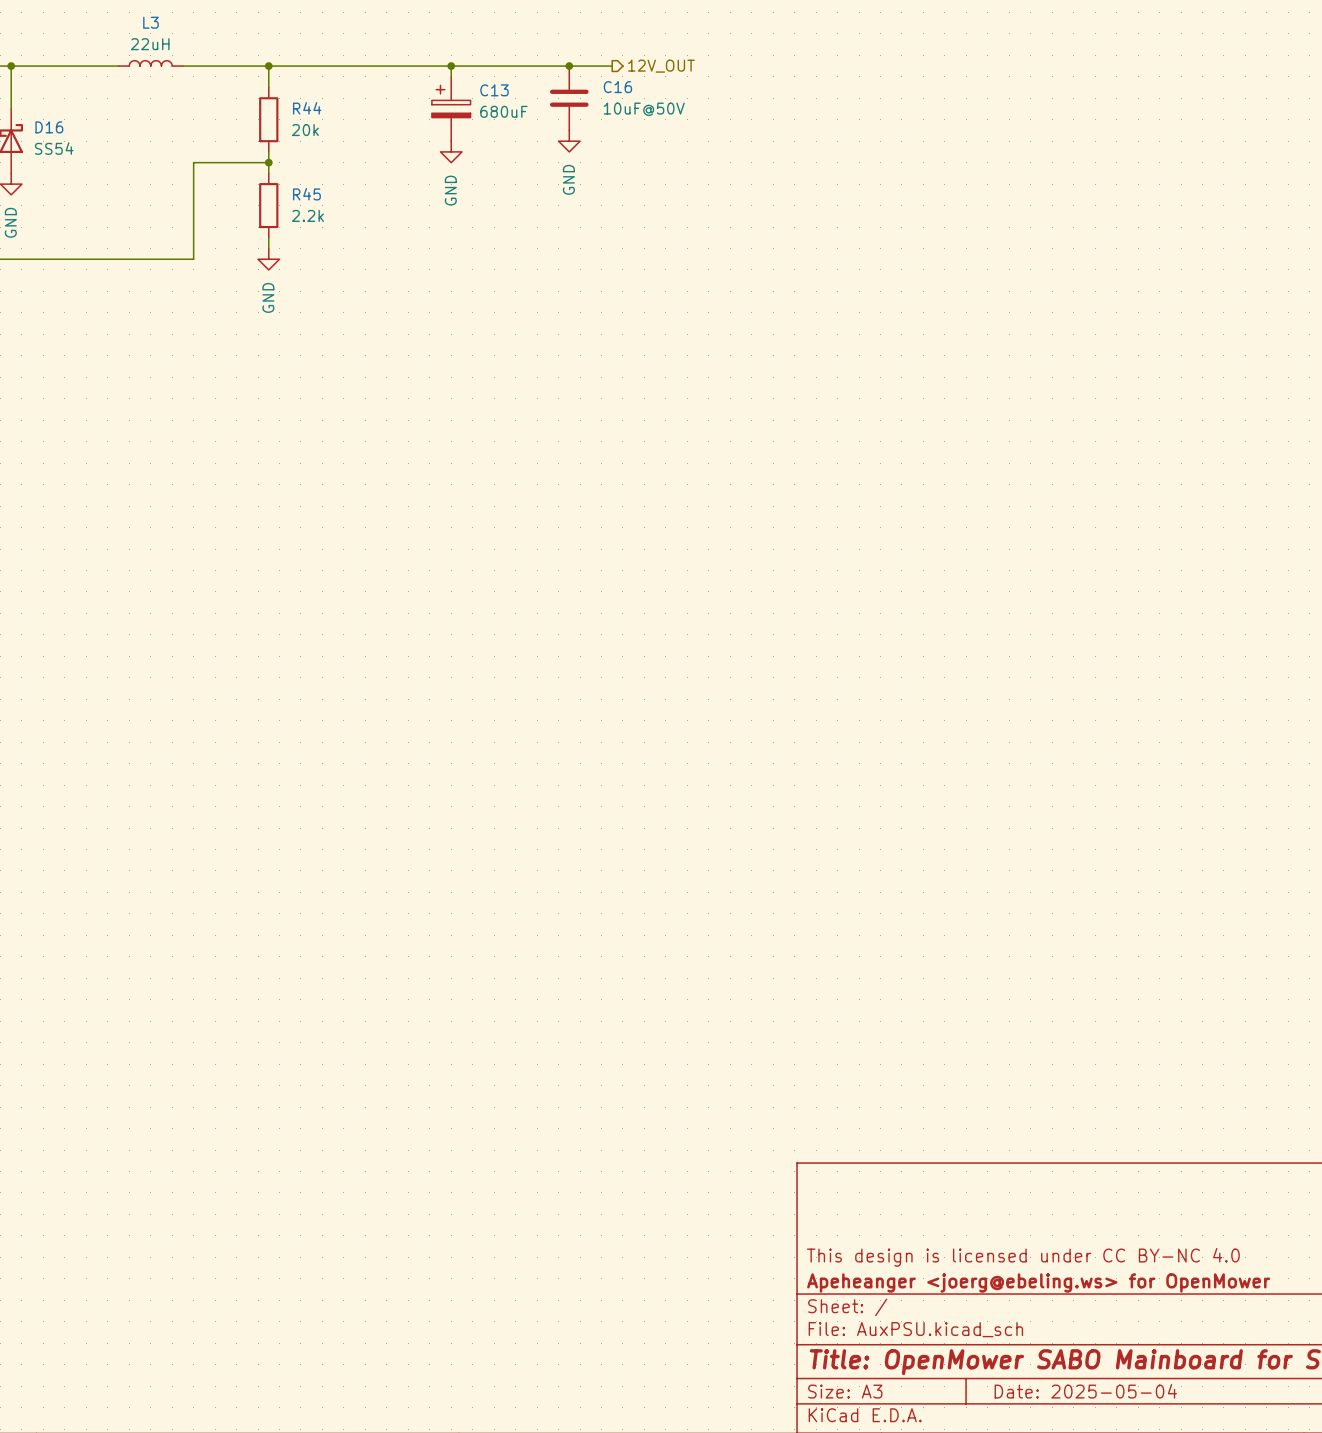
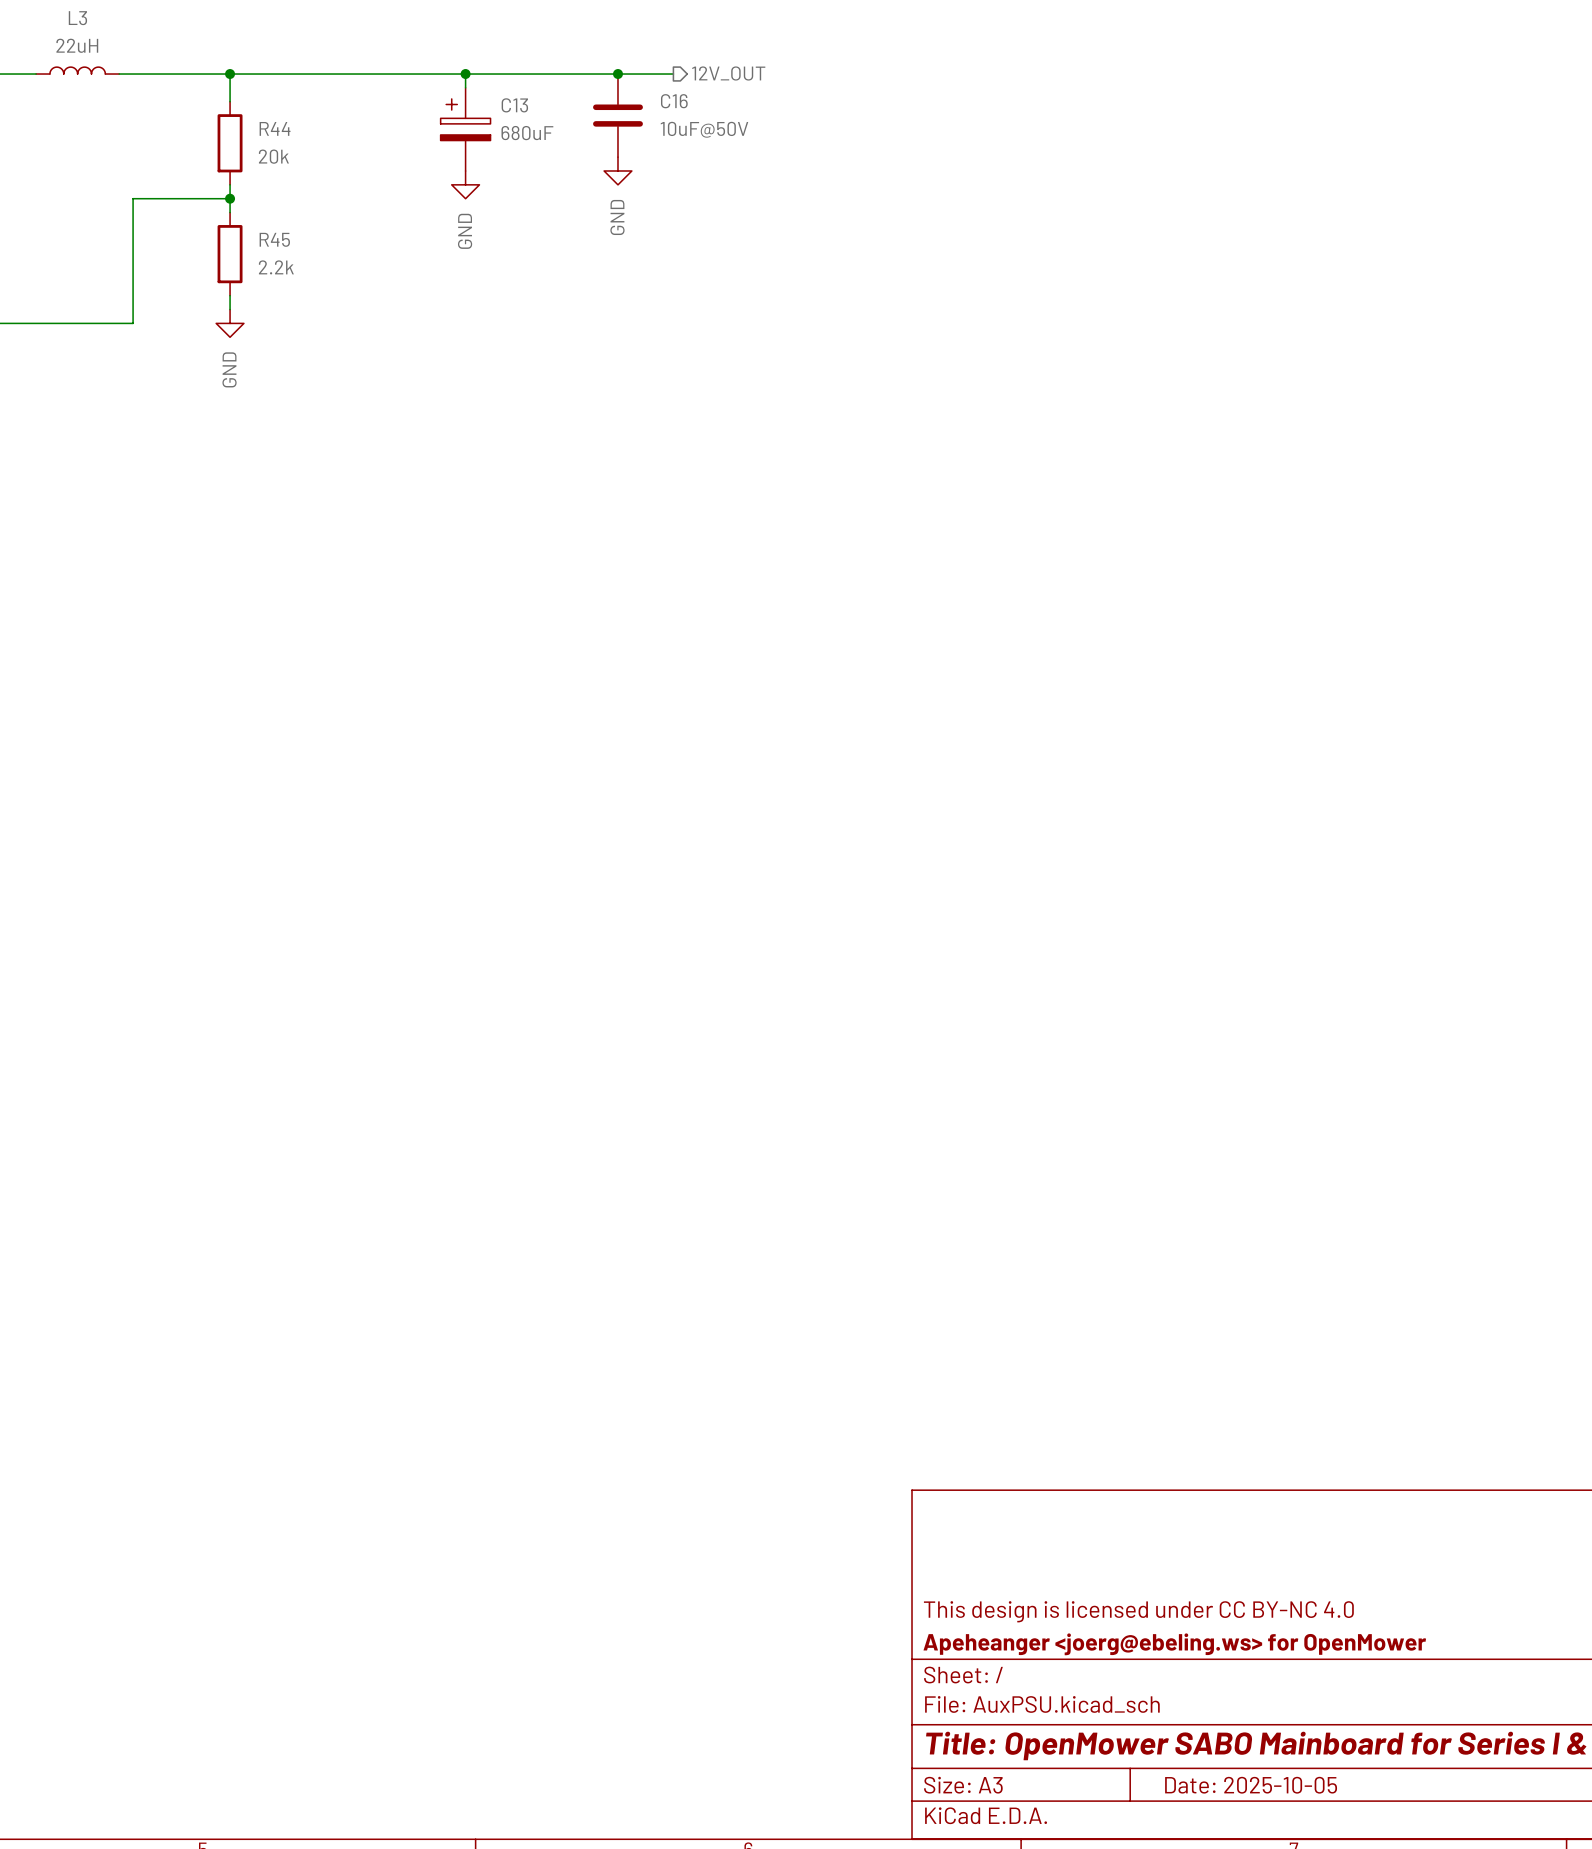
title block: Date: 2025-05-04 (1085, 1391) -> Date: 2025-10-05 (1251, 1785)

